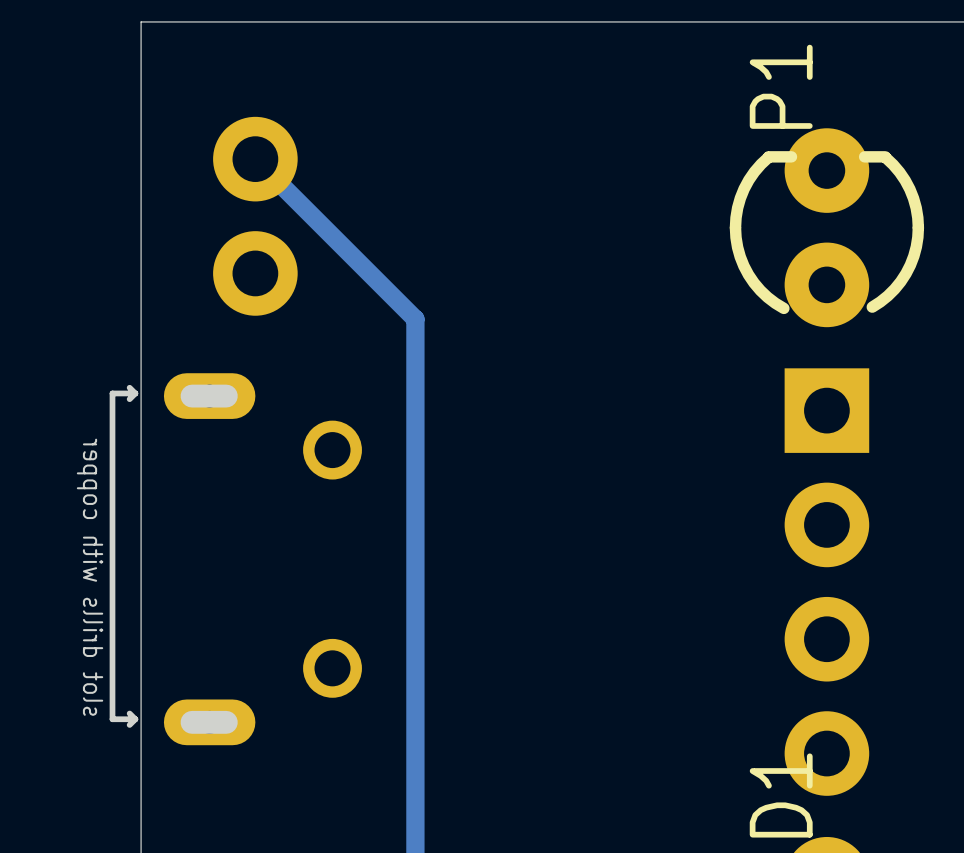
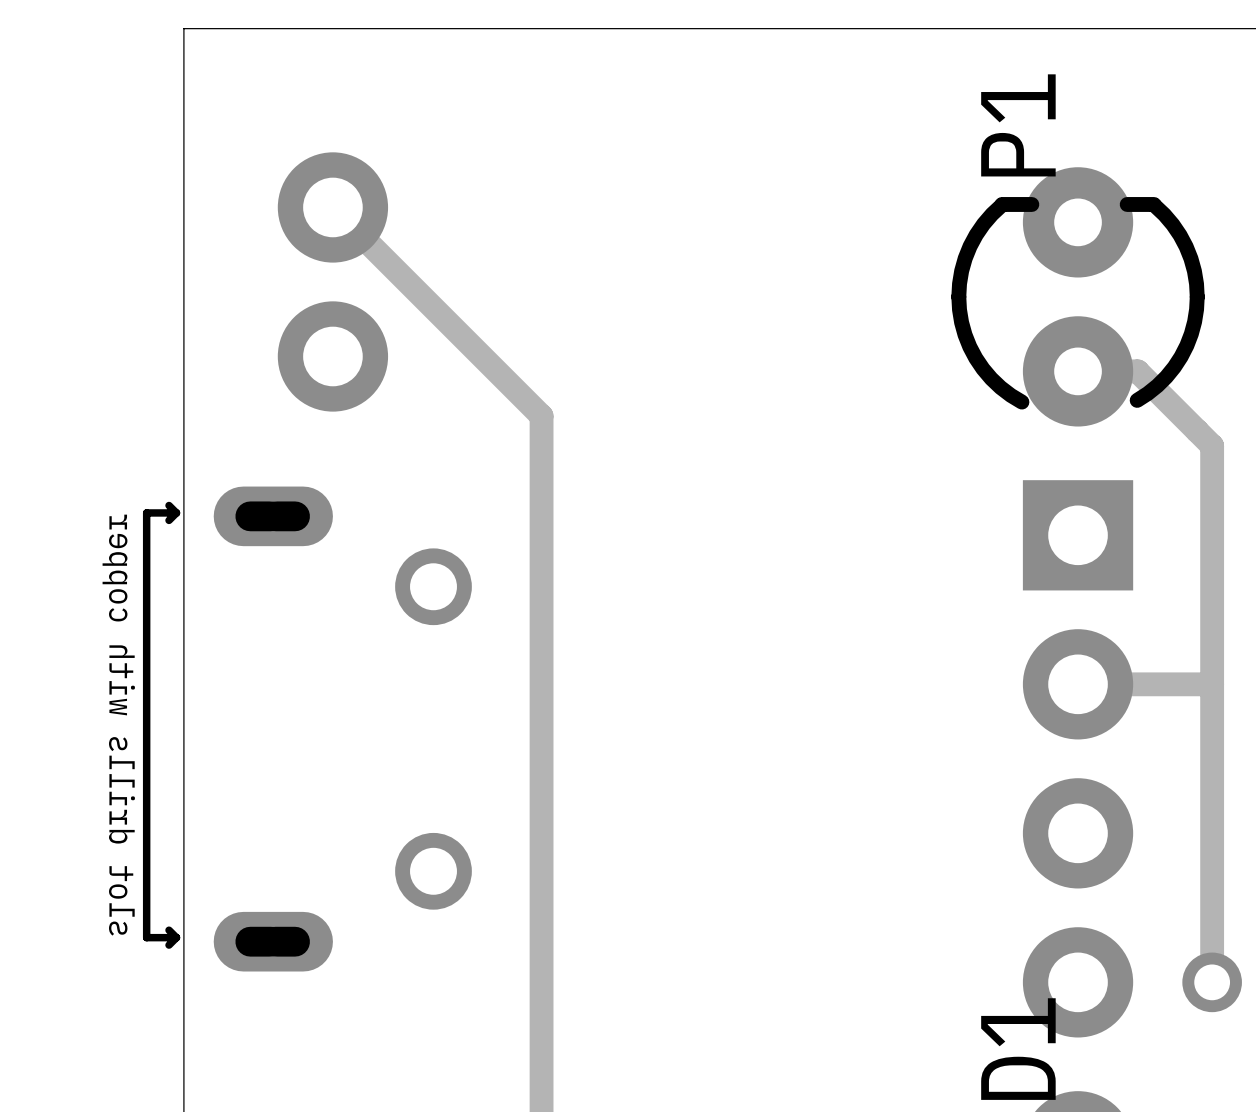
track: none -> (1078, 371) (1137, 371) (1212, 445) (1212, 982)
track: none -> (1212, 684) (1078, 684)
via: none -> (1212, 982)

